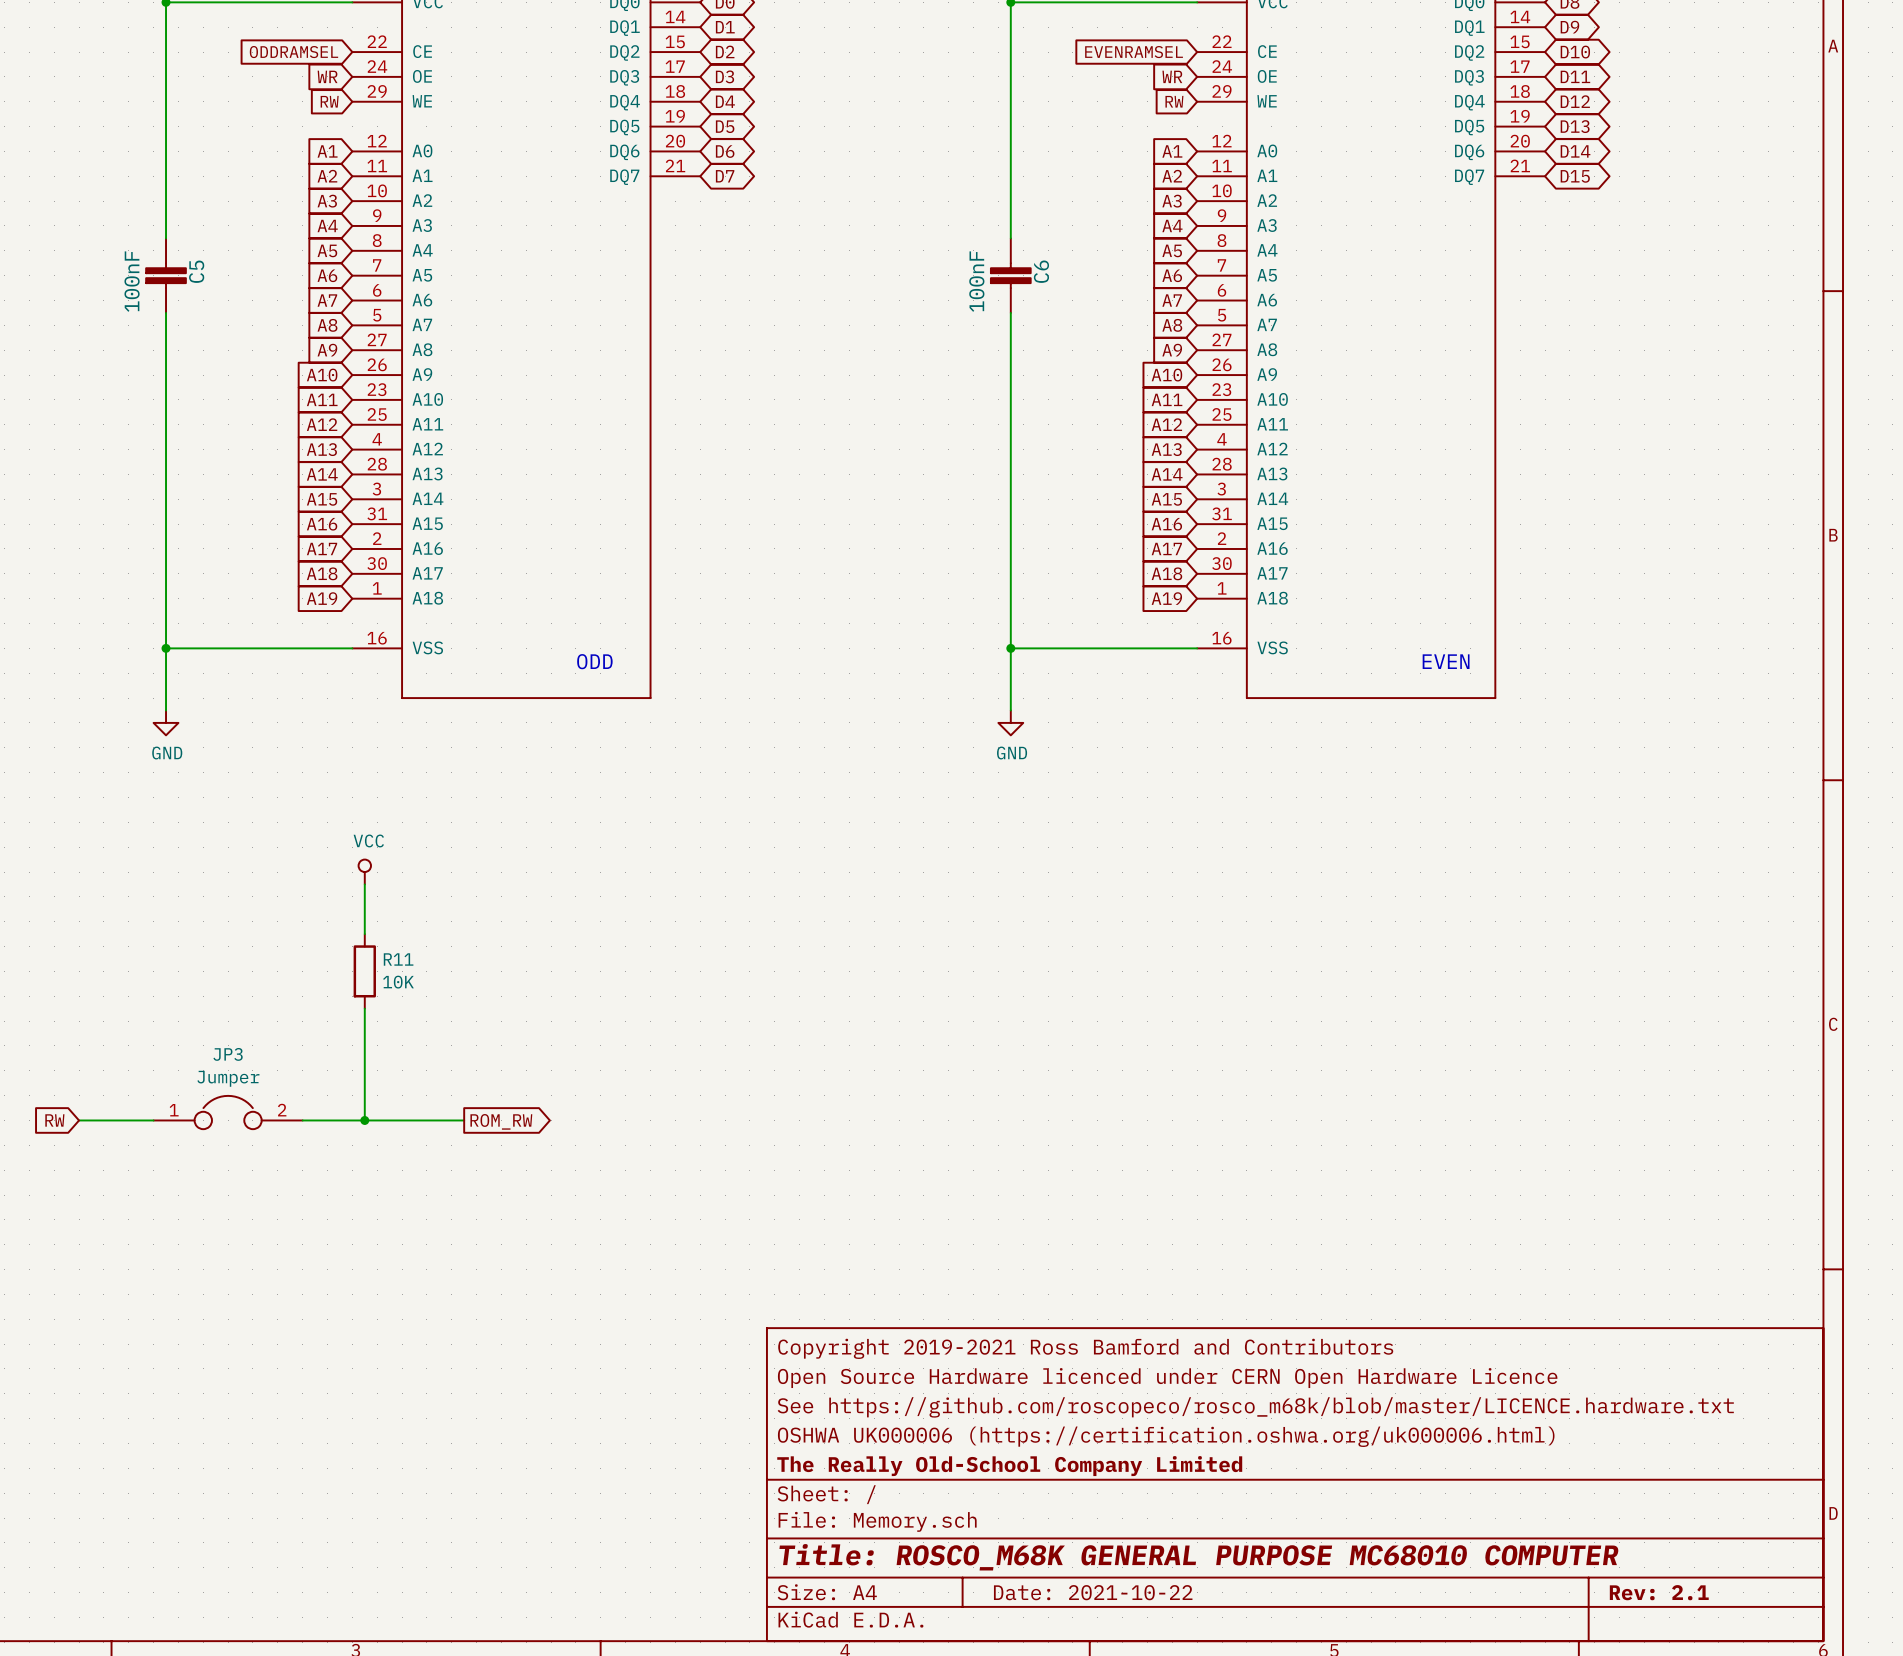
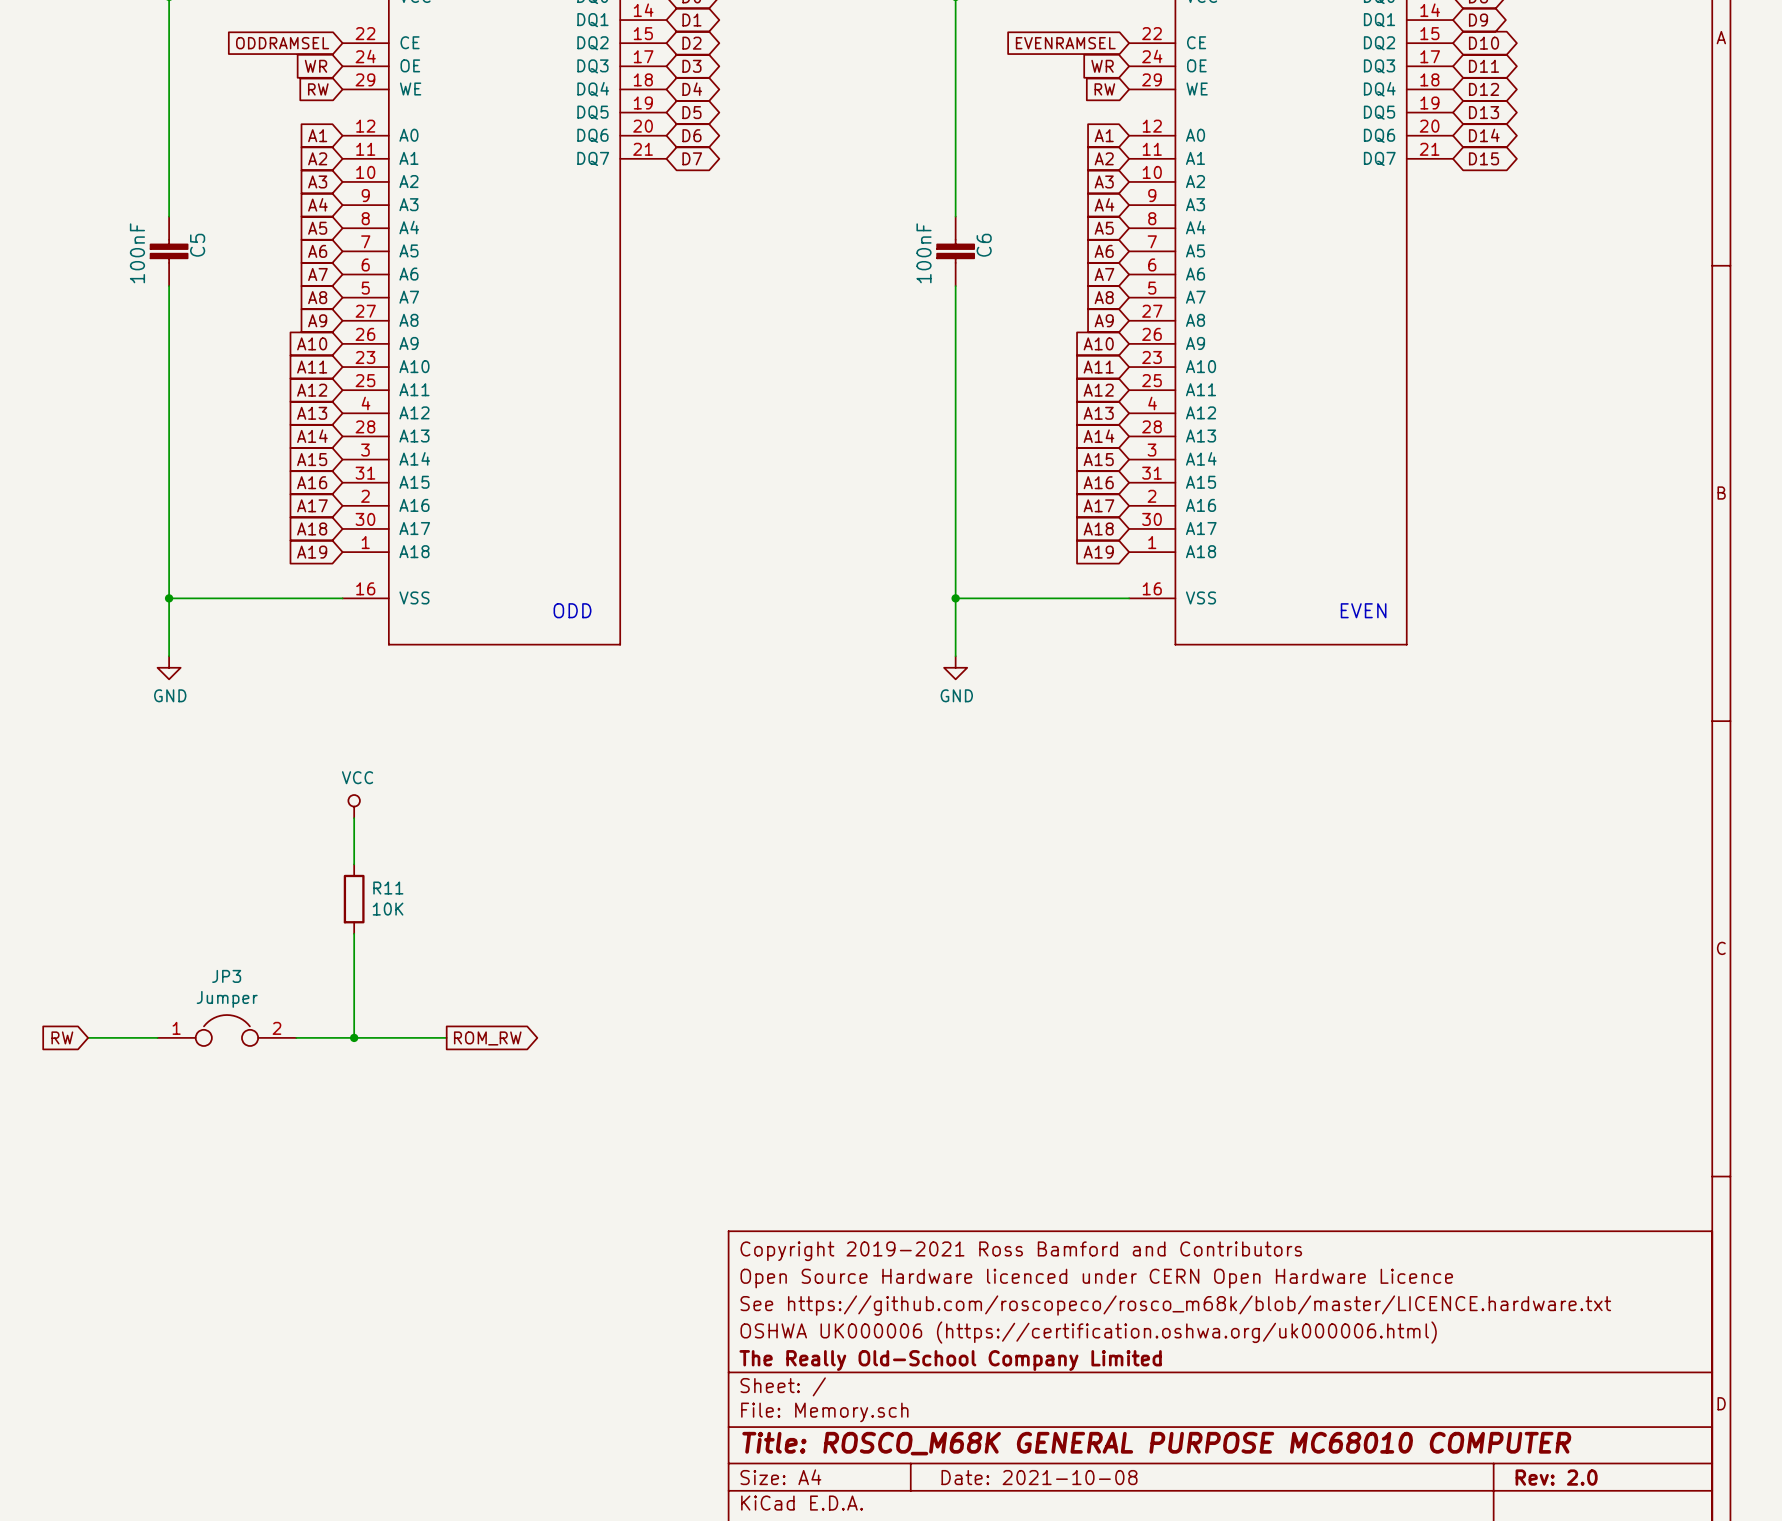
title block: Date: 2021-10-22 (1093, 1592) -> Date: 2021-10-08 (1039, 1477)
title block: Rev: 2.1 (1659, 1592) -> Rev: 2.0 (1556, 1477)

